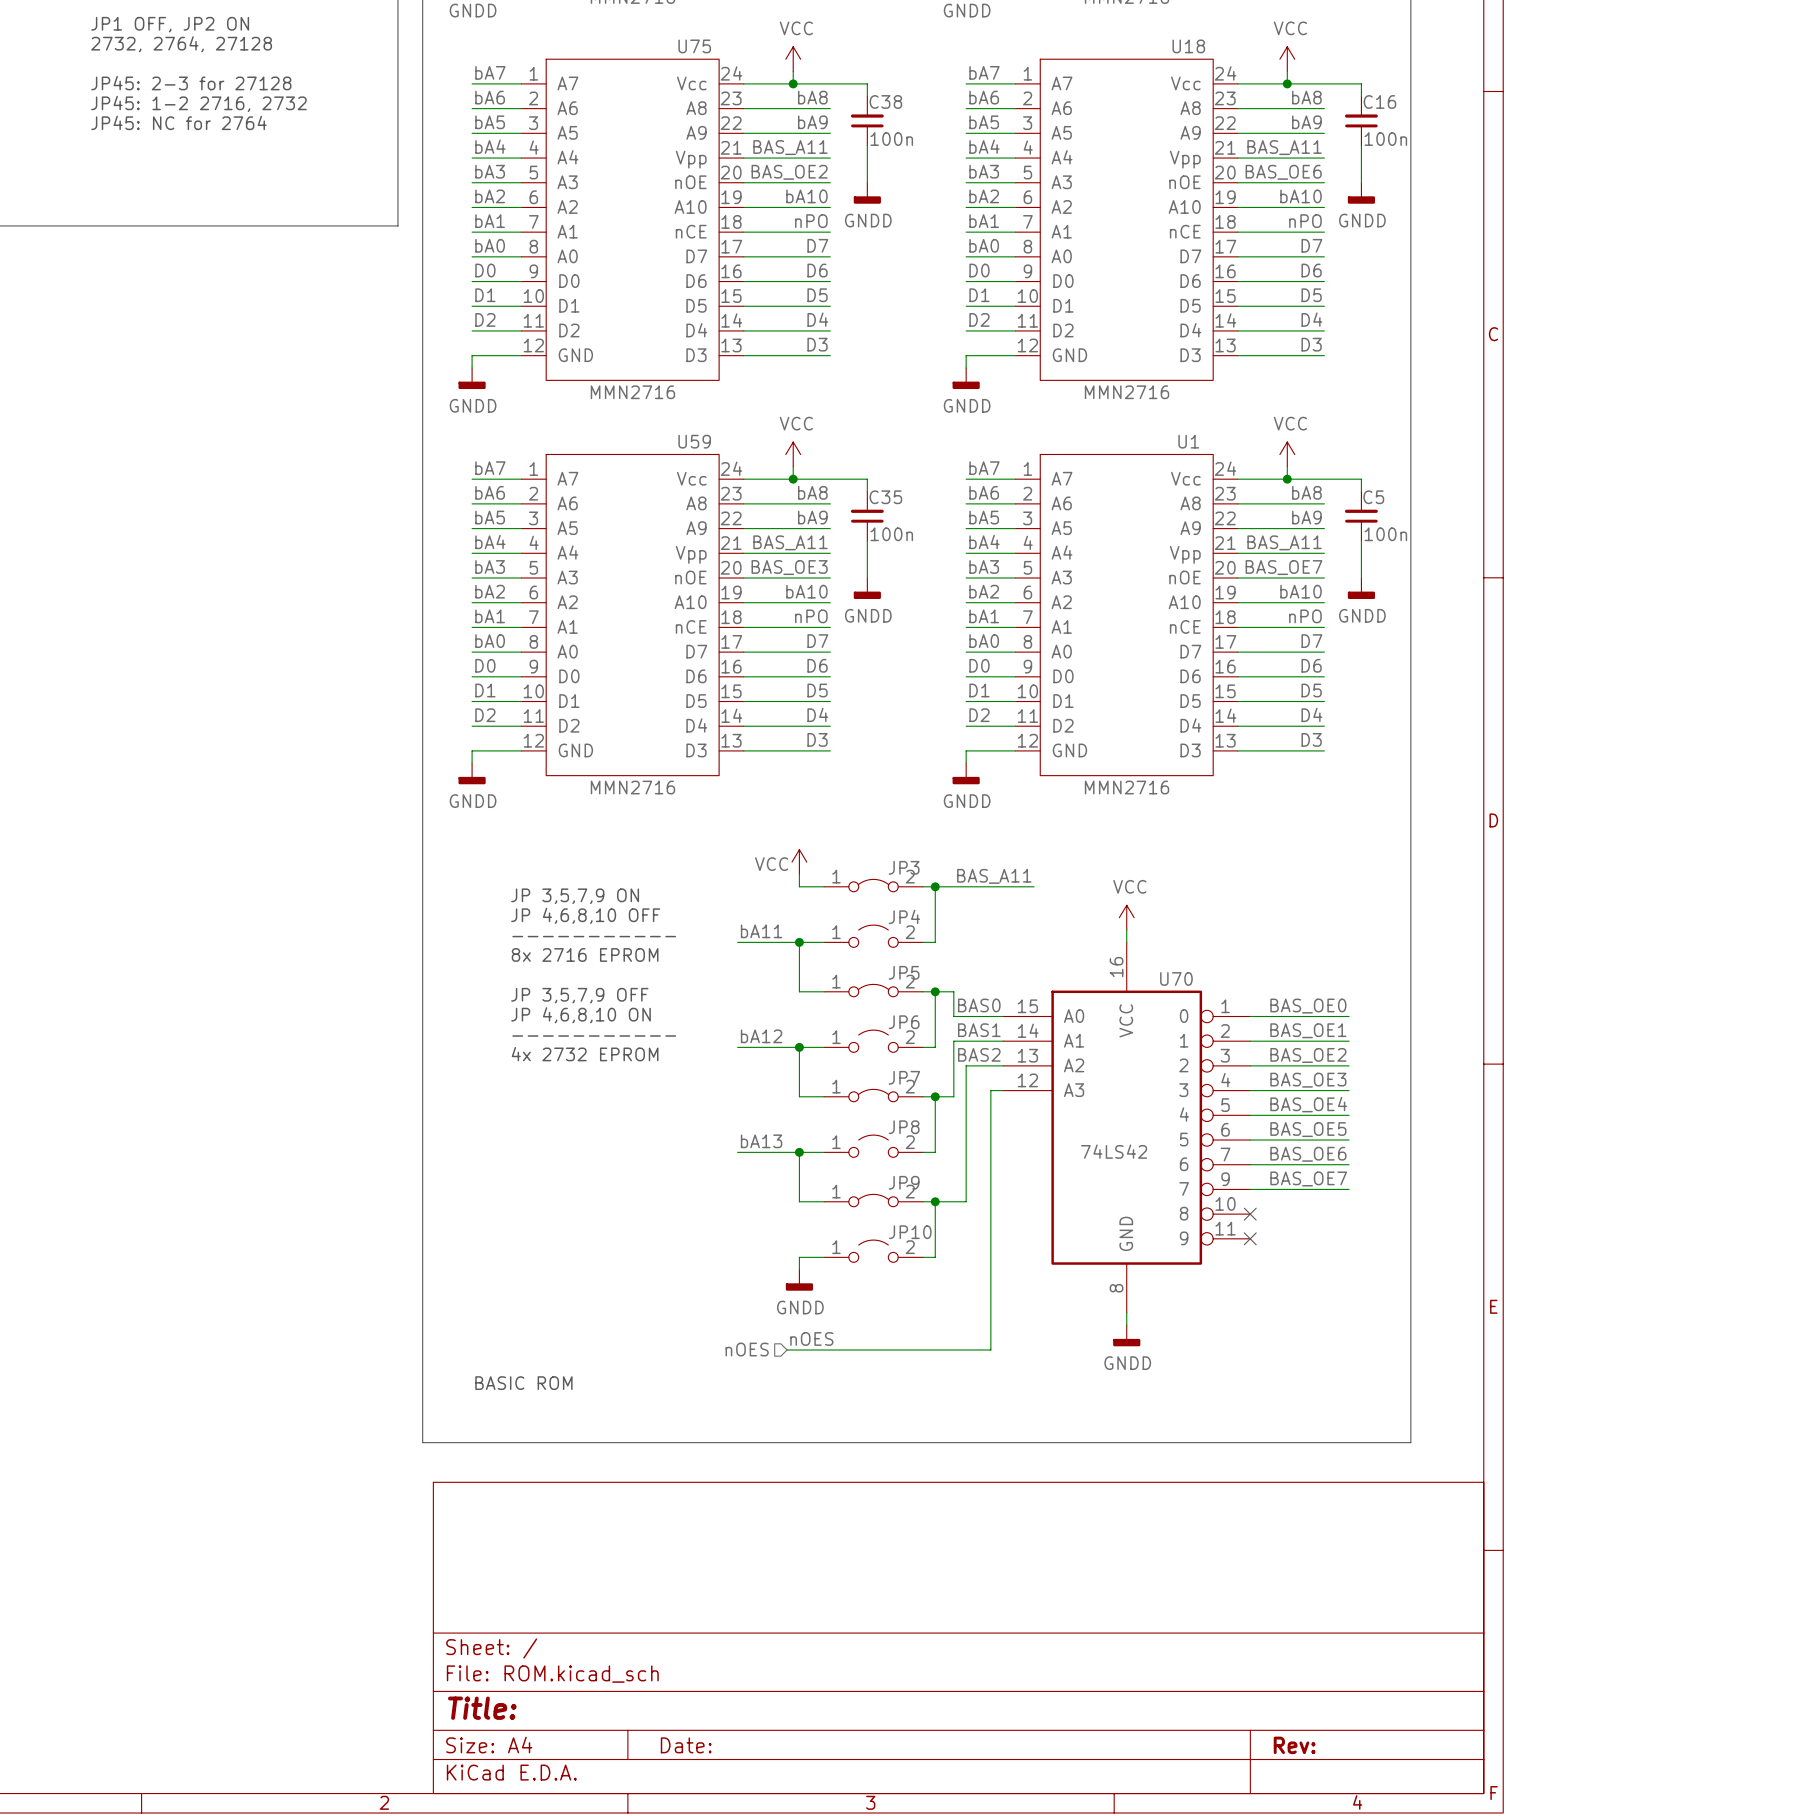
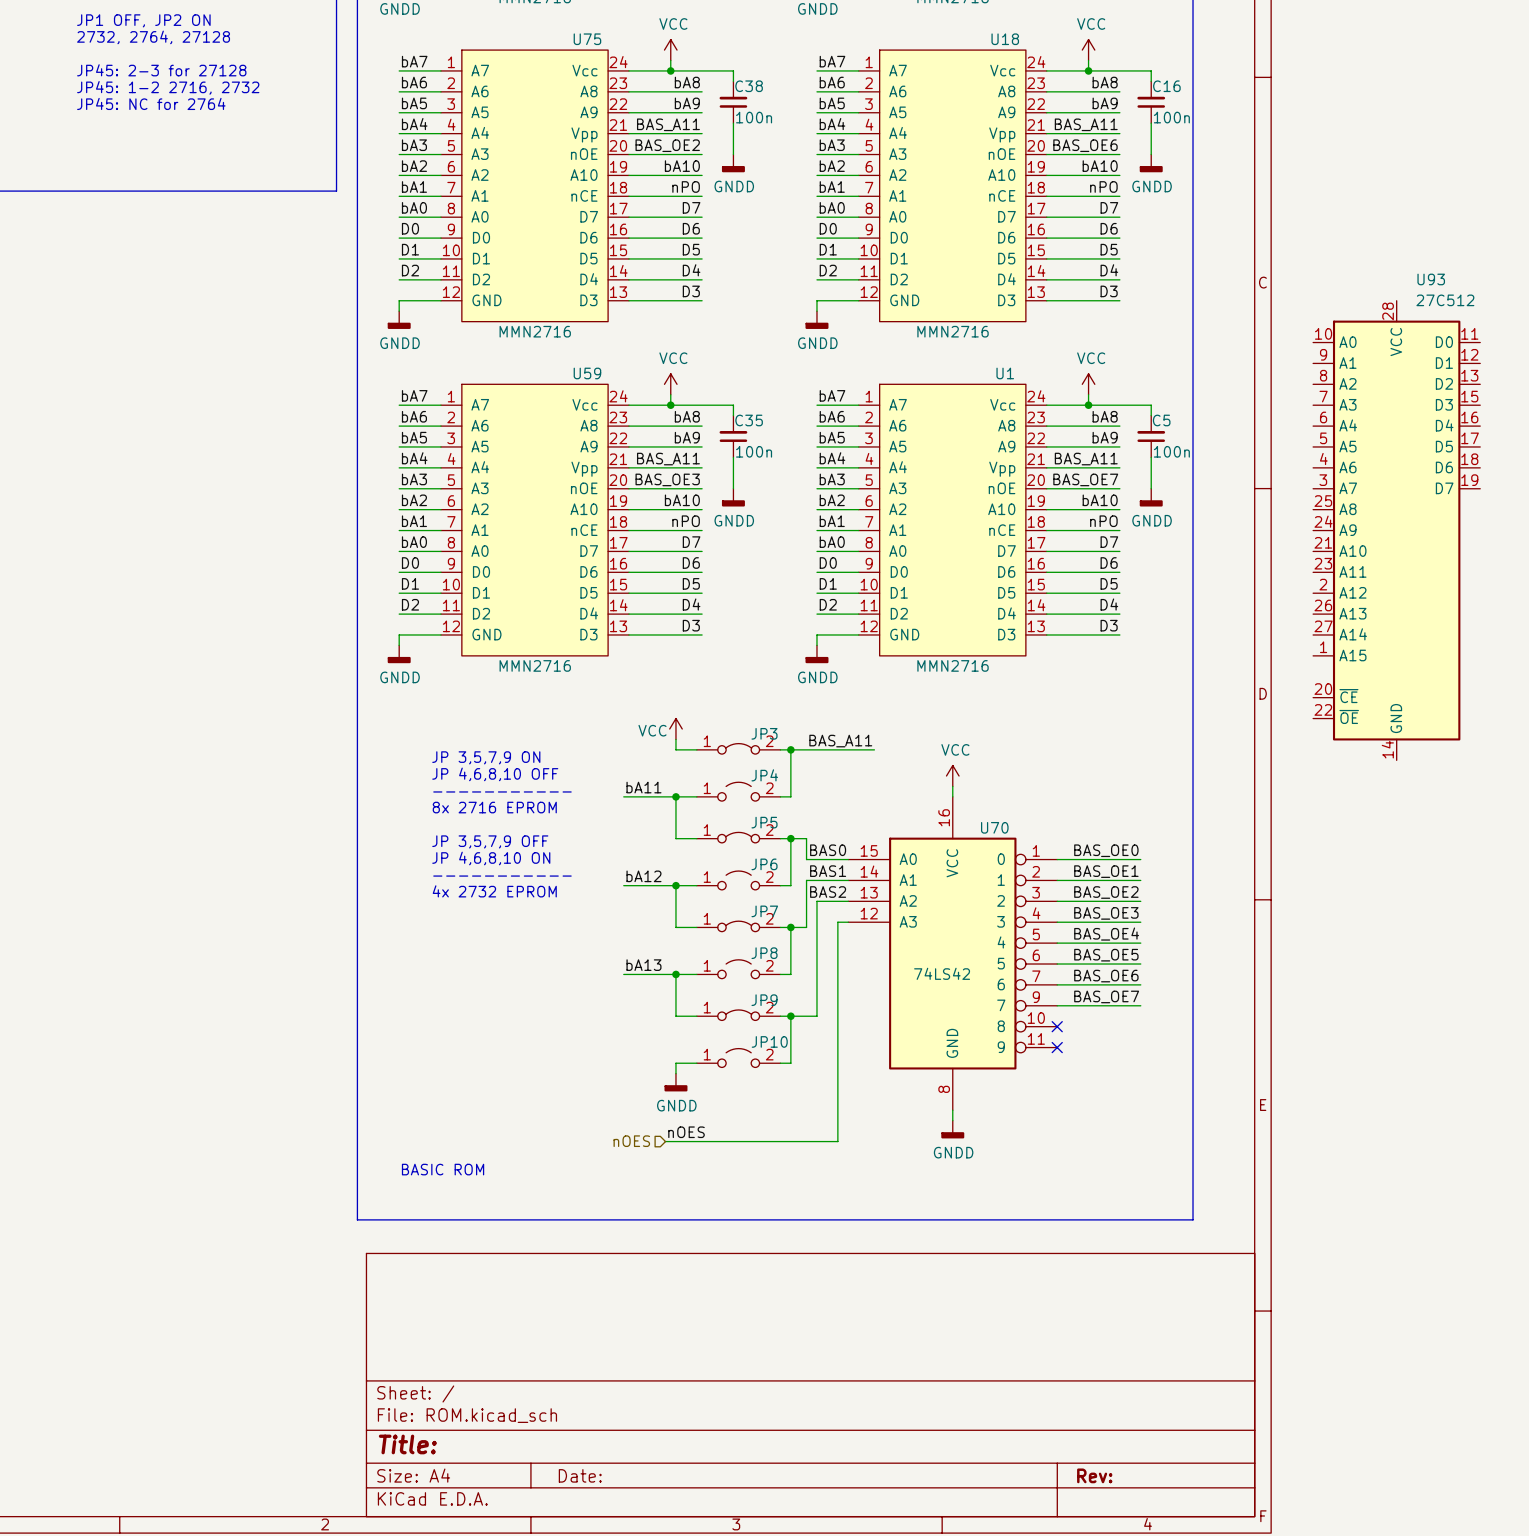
U93: none -> 27C512 (1396, 530)

